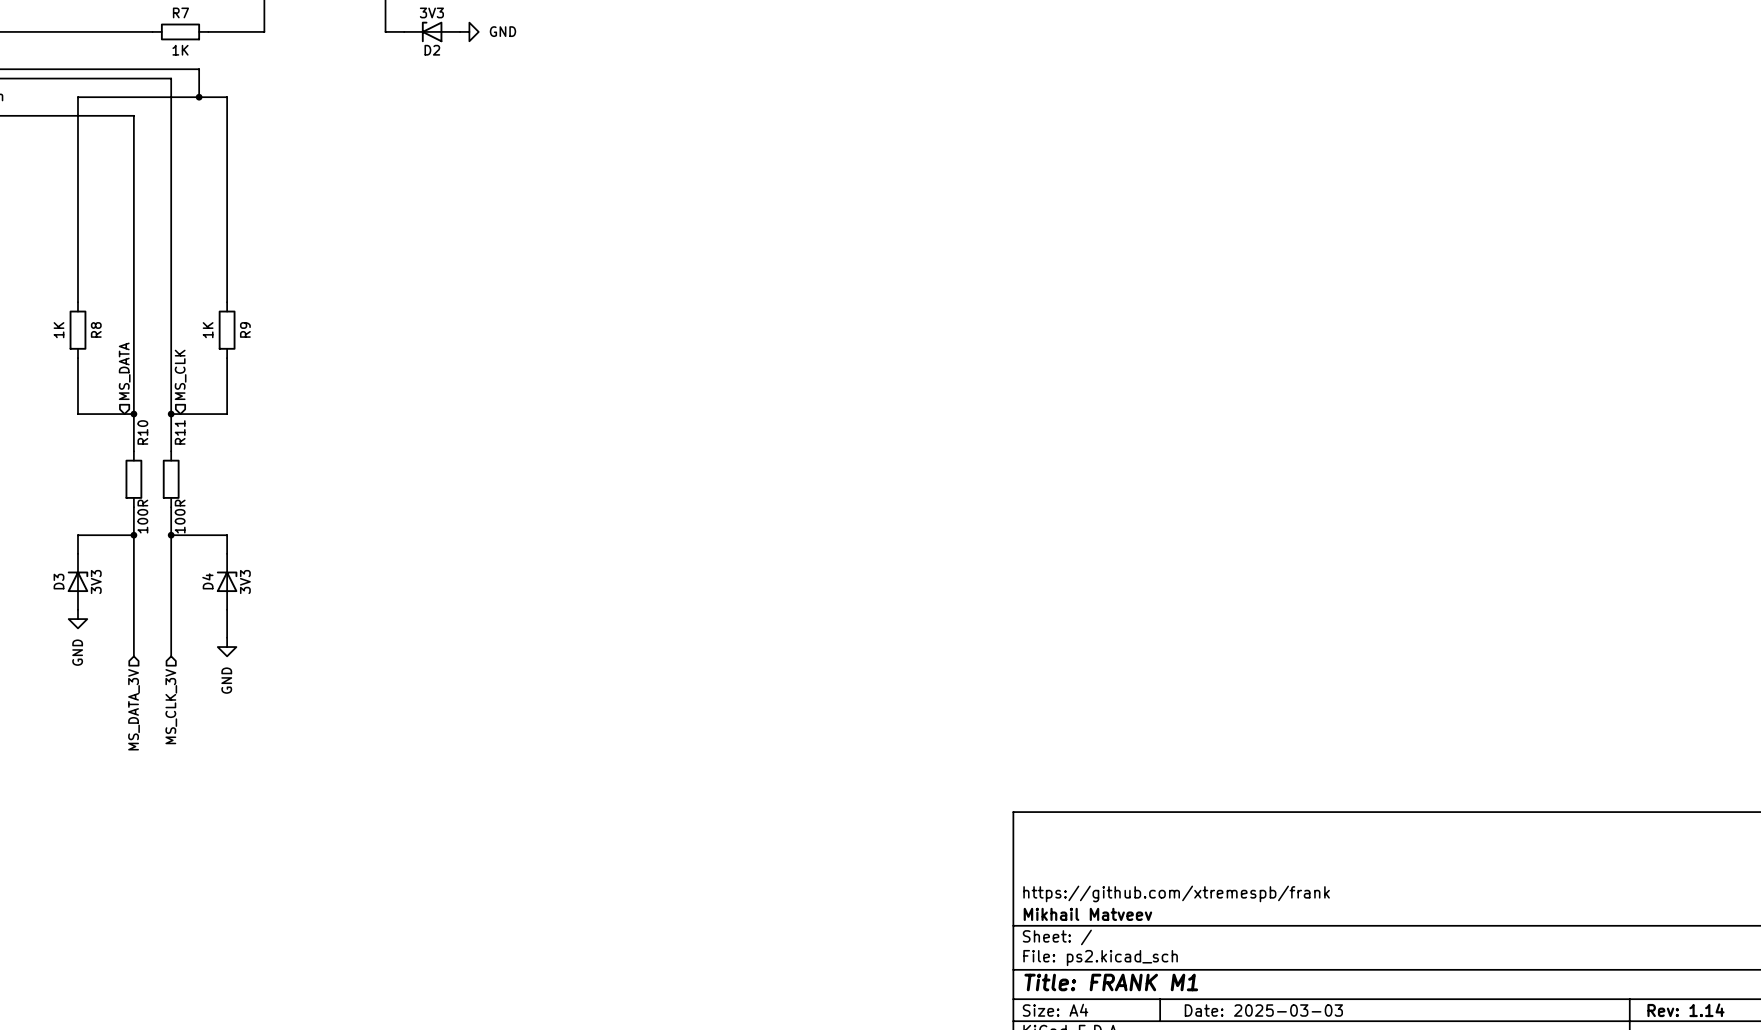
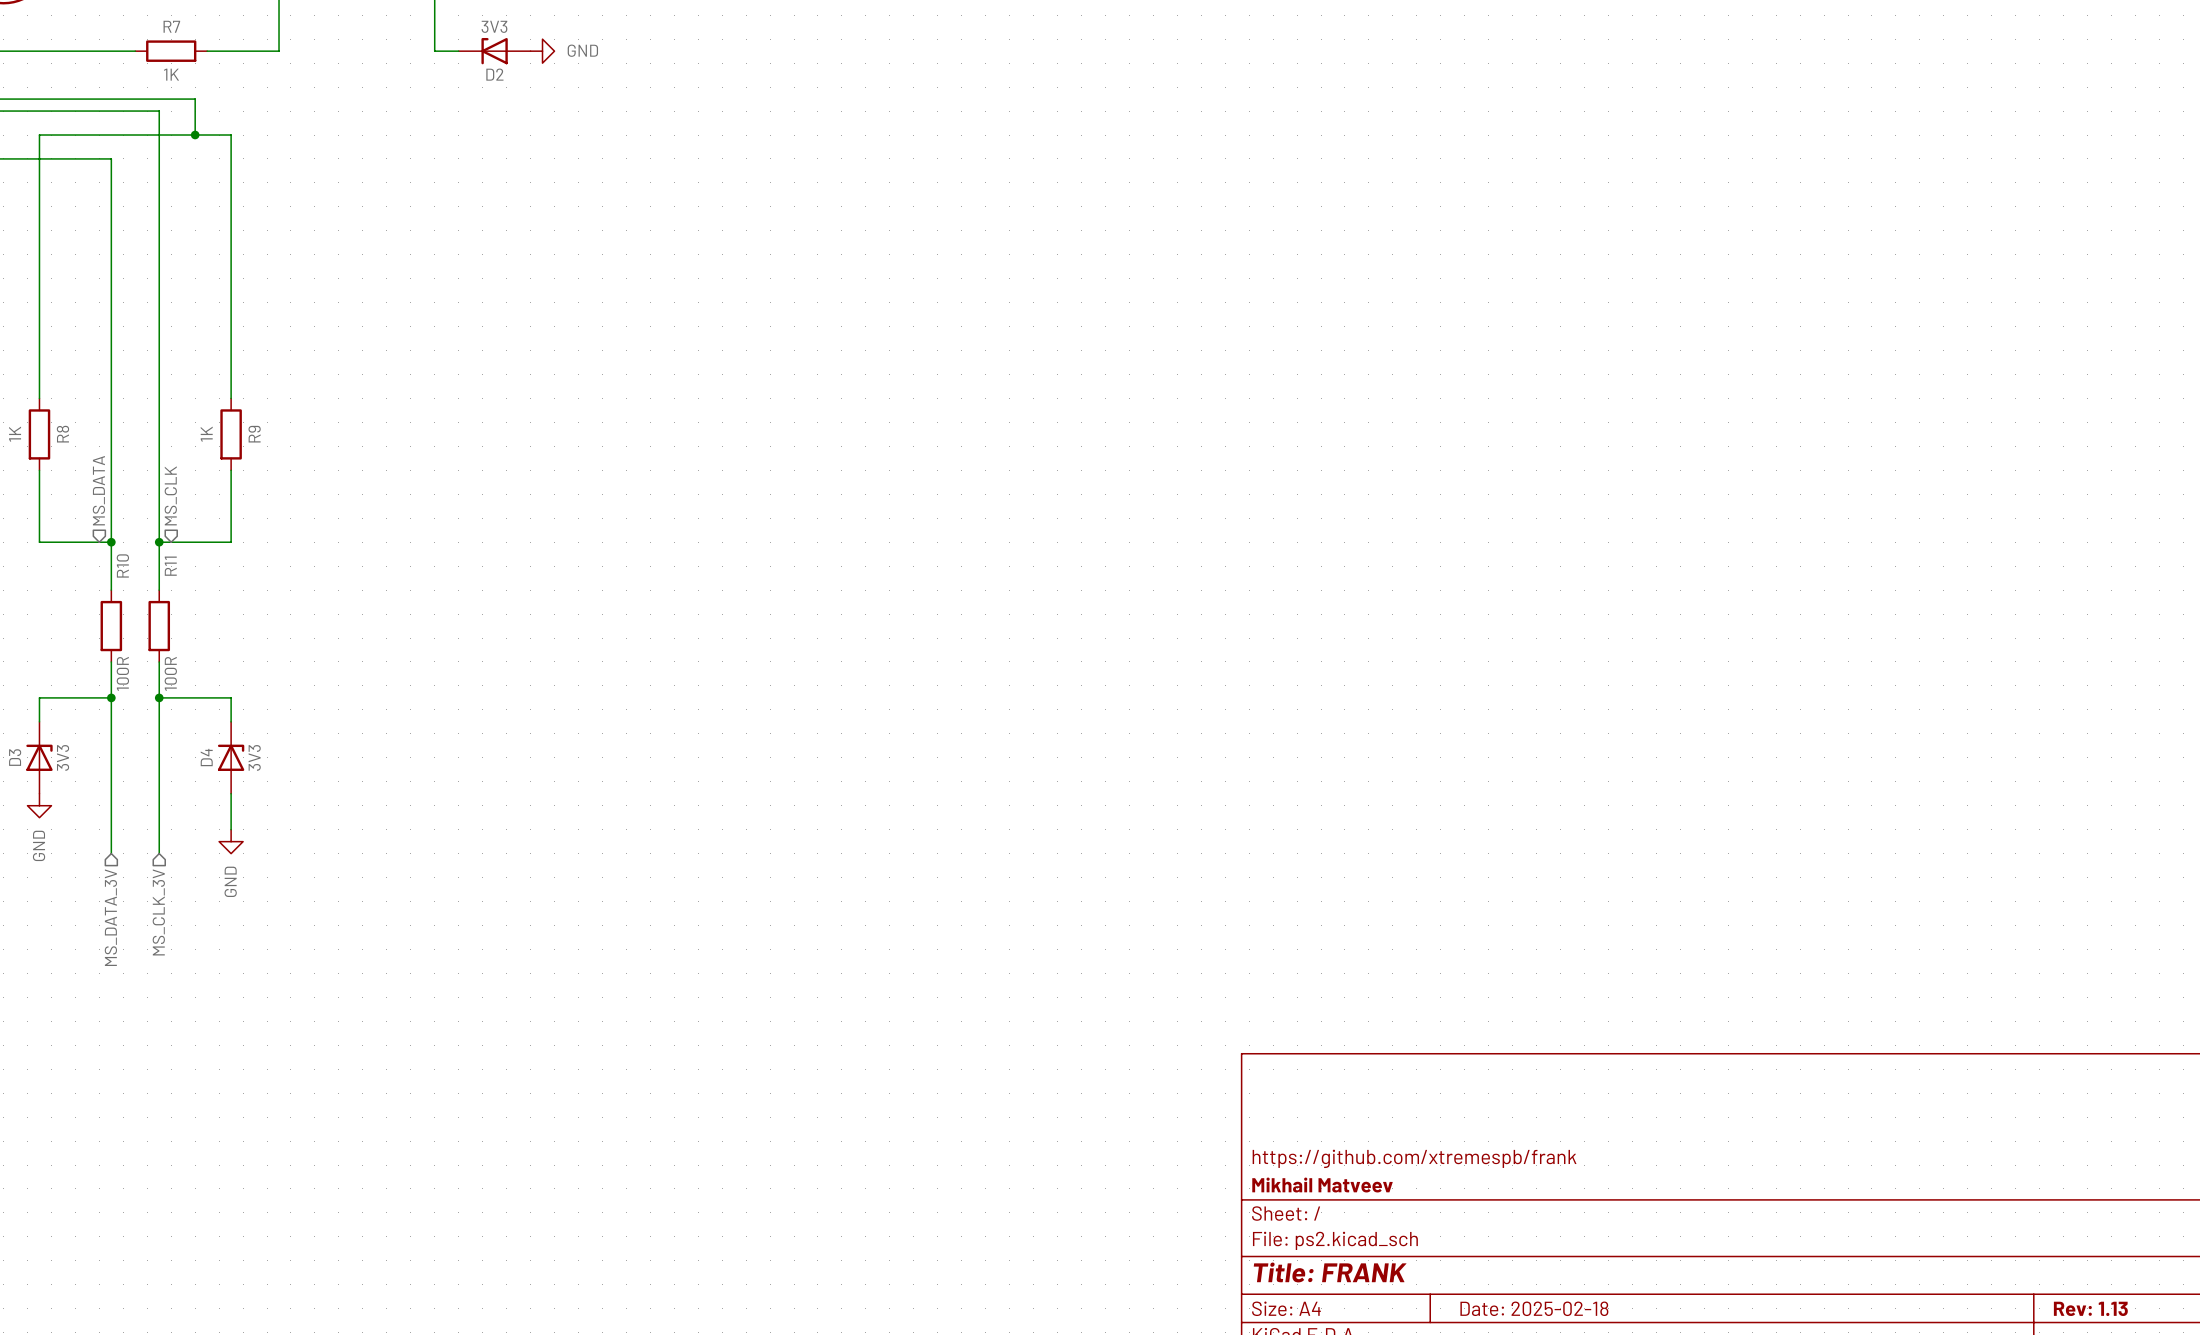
title block: Title: FRANK M1 (1111, 982) -> Title: FRANK (1330, 1272)
title block: Date: 2025-03-03 (1263, 1010) -> Date: 2025-02-18 (1534, 1308)
title block: Rev: 1.14 (1685, 1010) -> Rev: 1.13 (2090, 1308)

